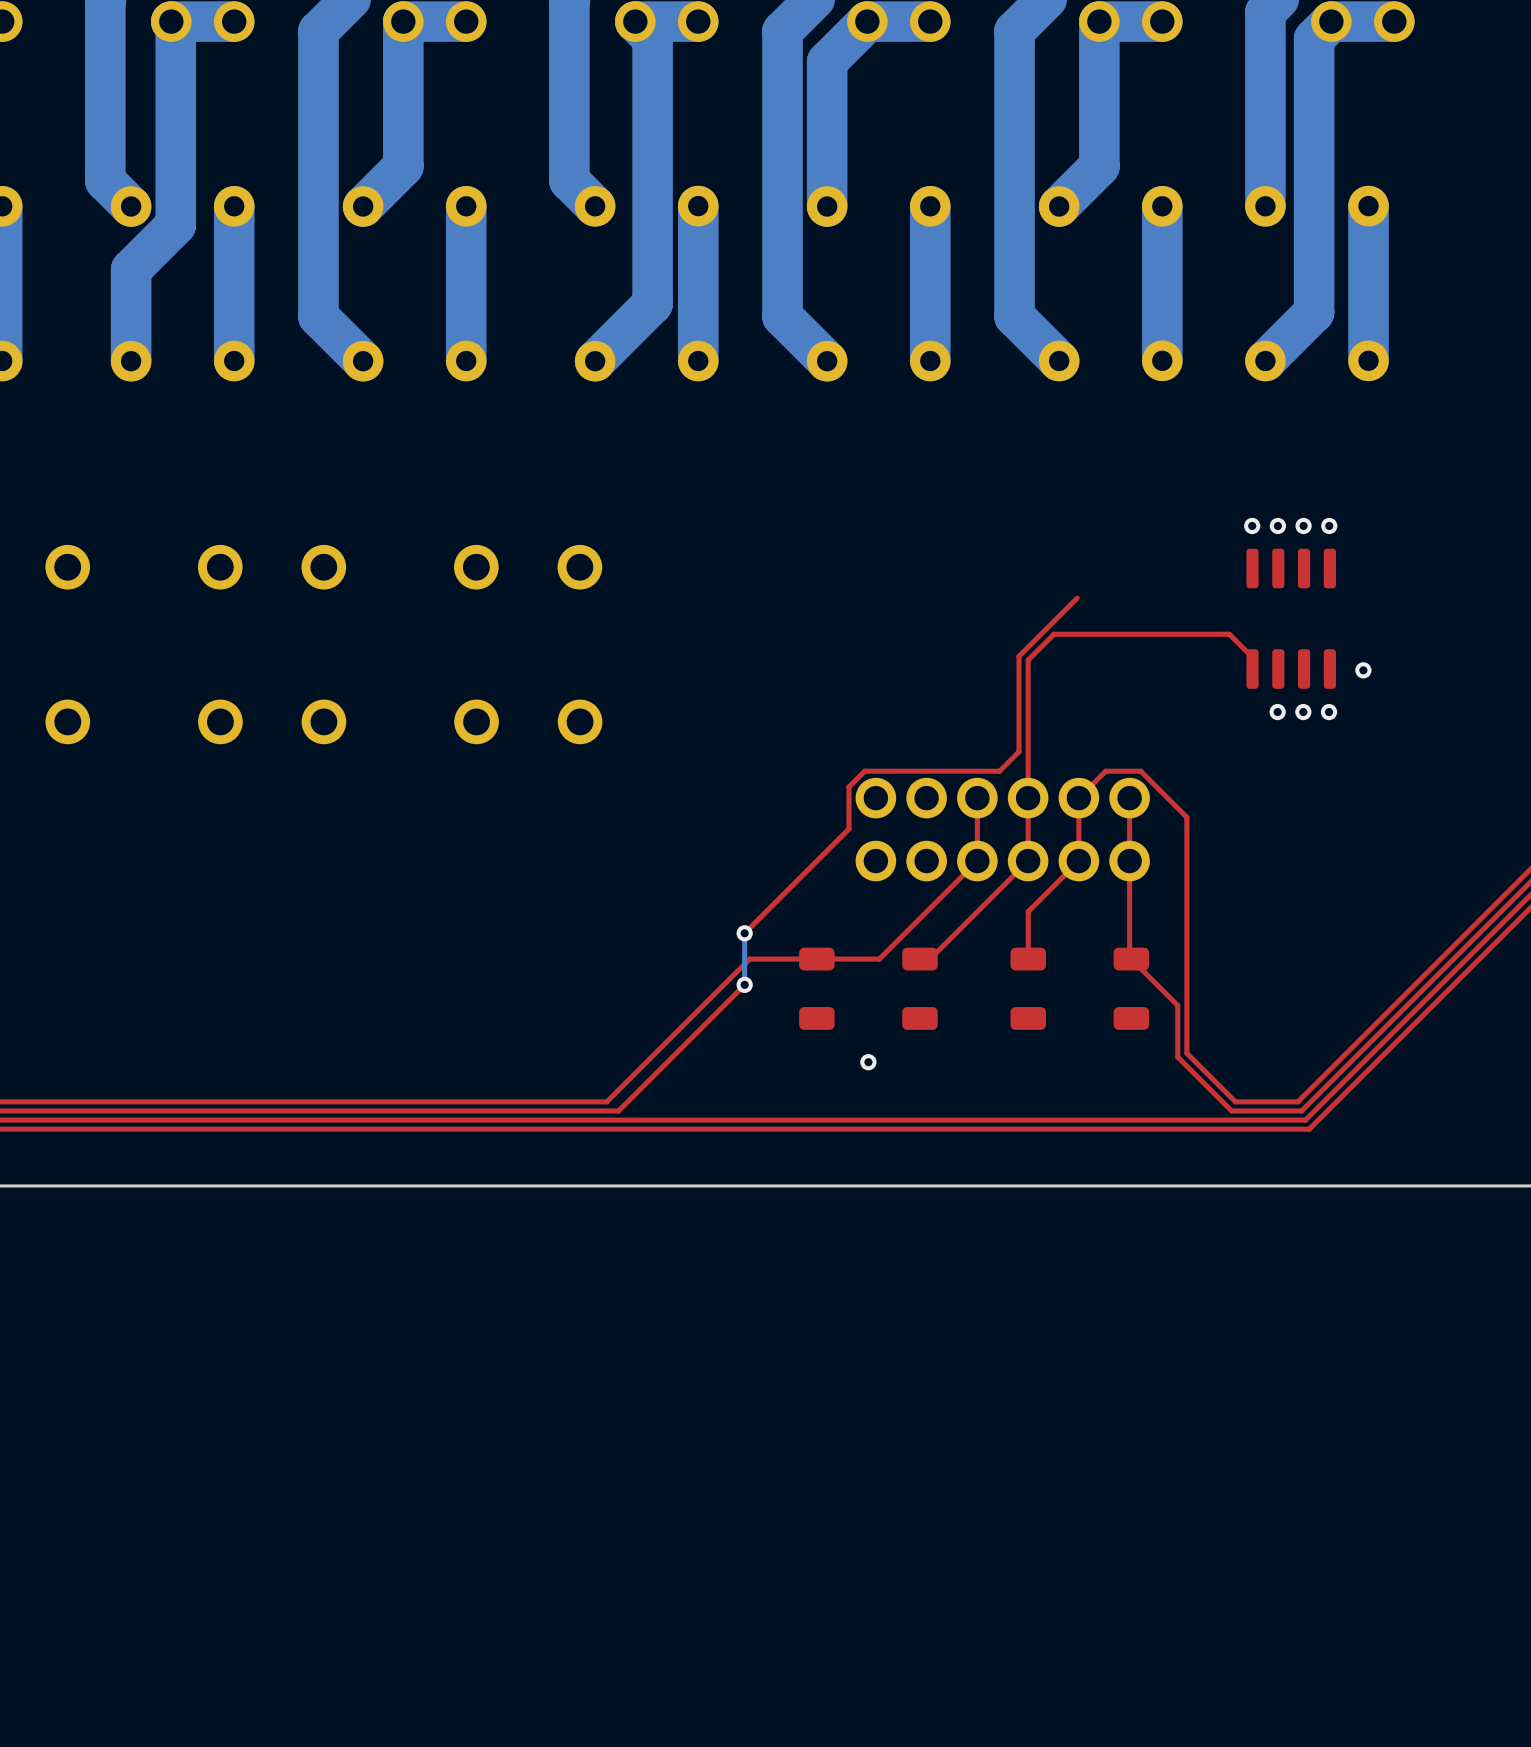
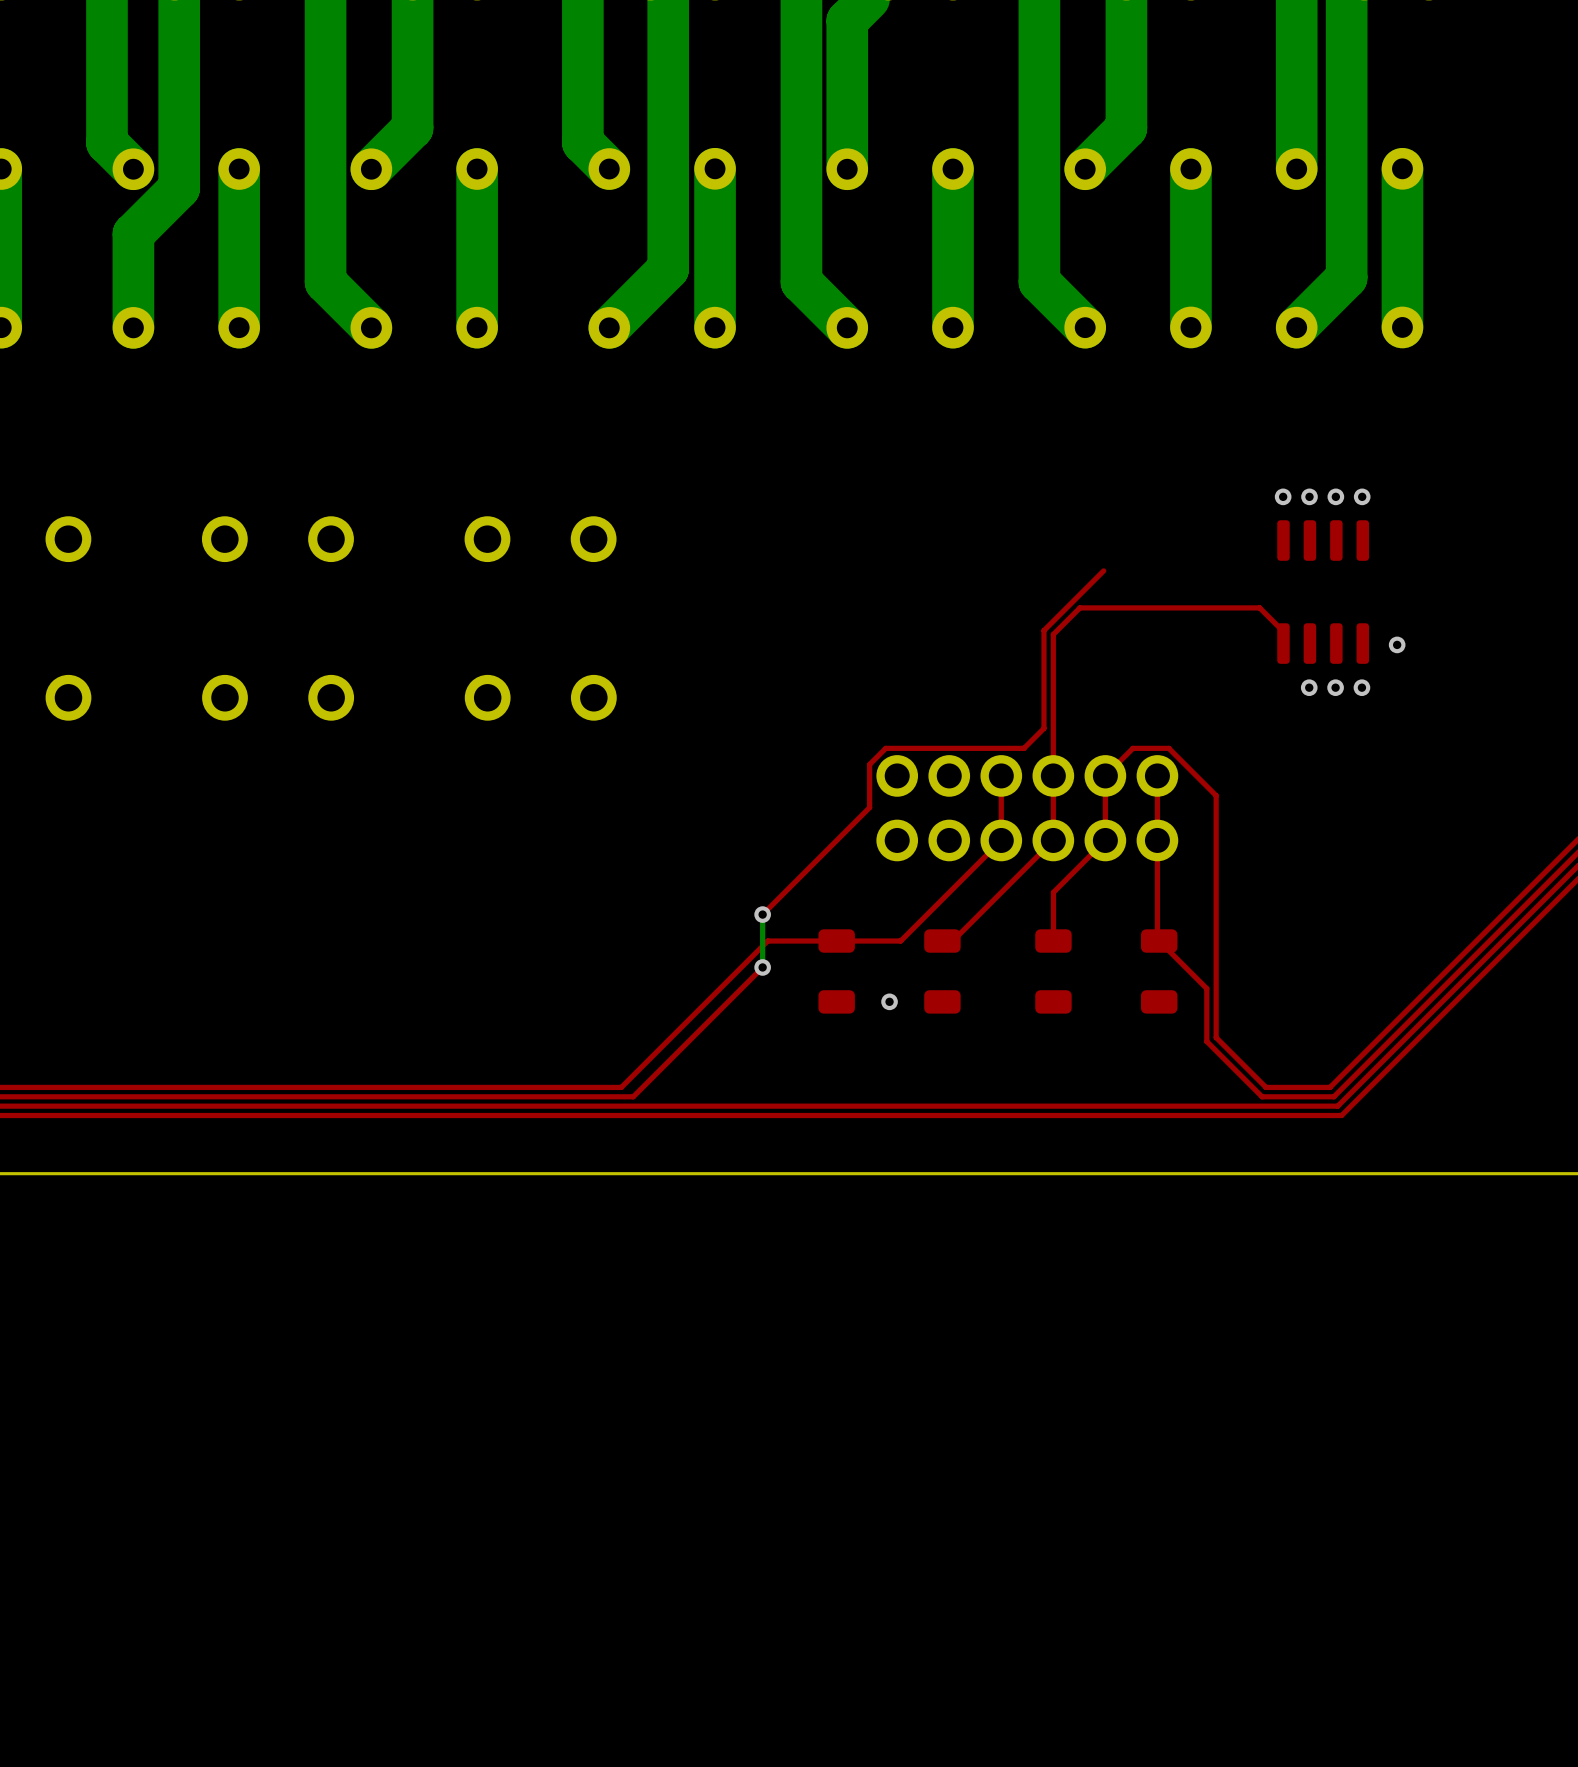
via position: (868, 1062) -> (889, 1001)

